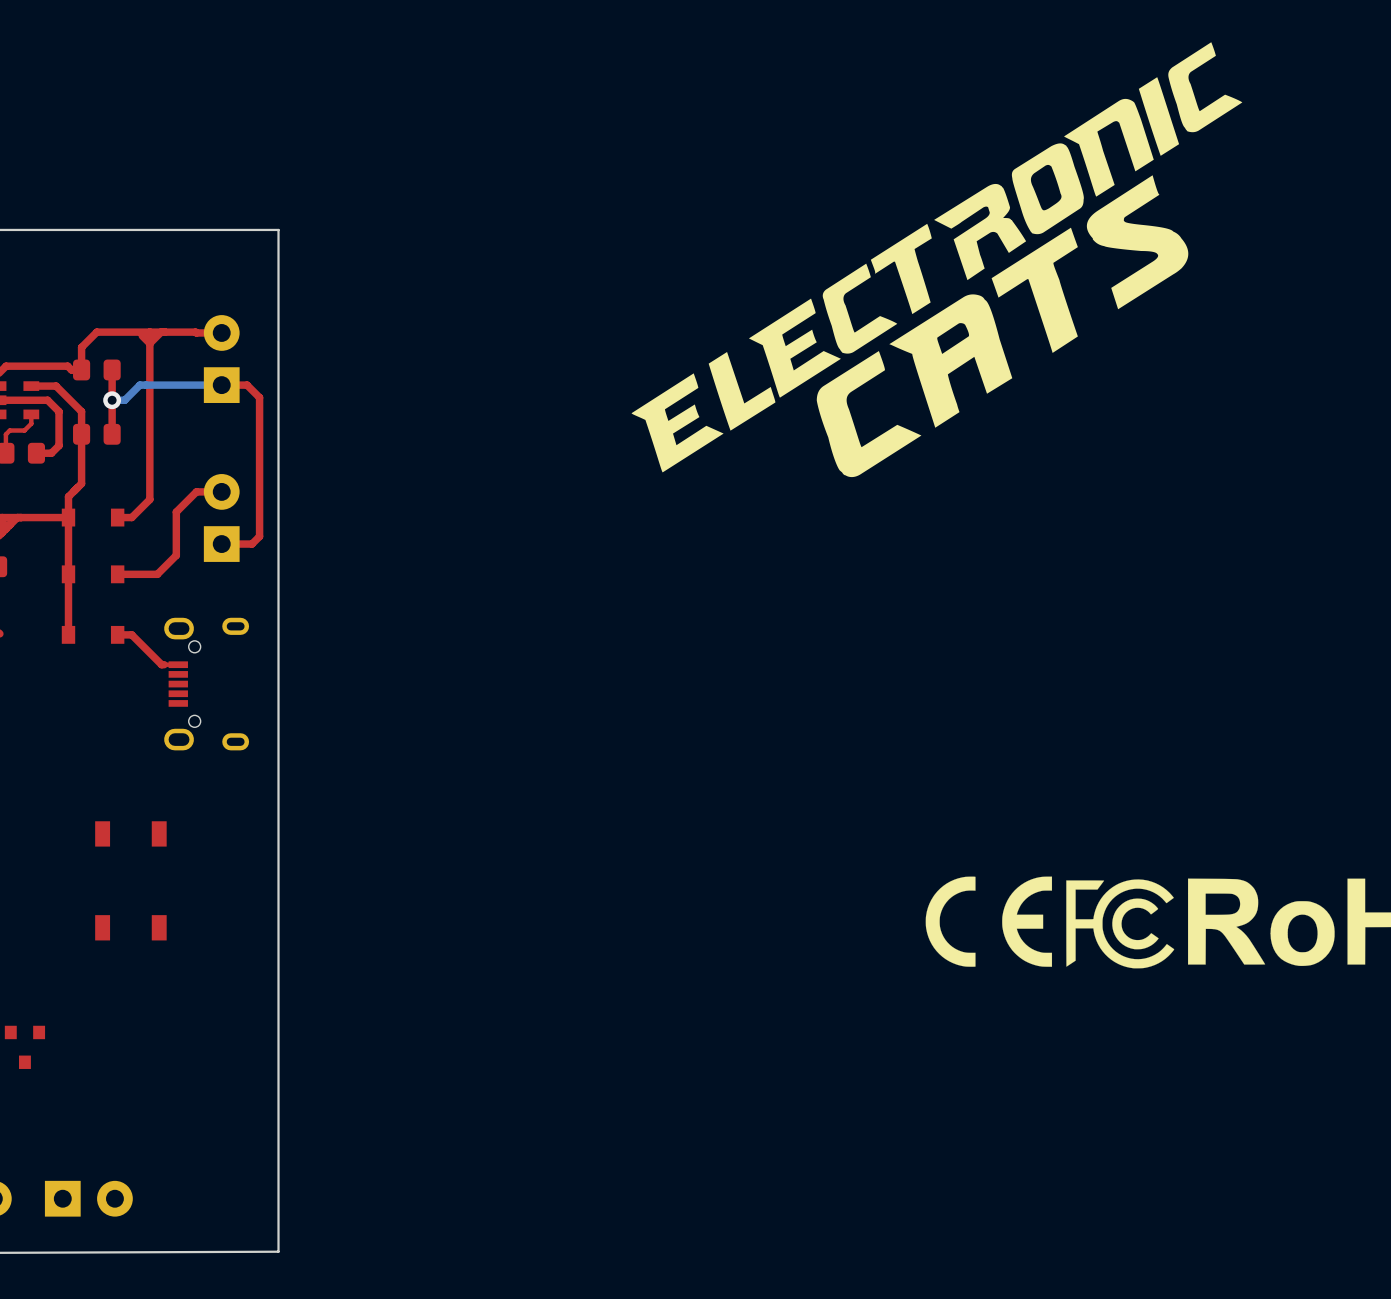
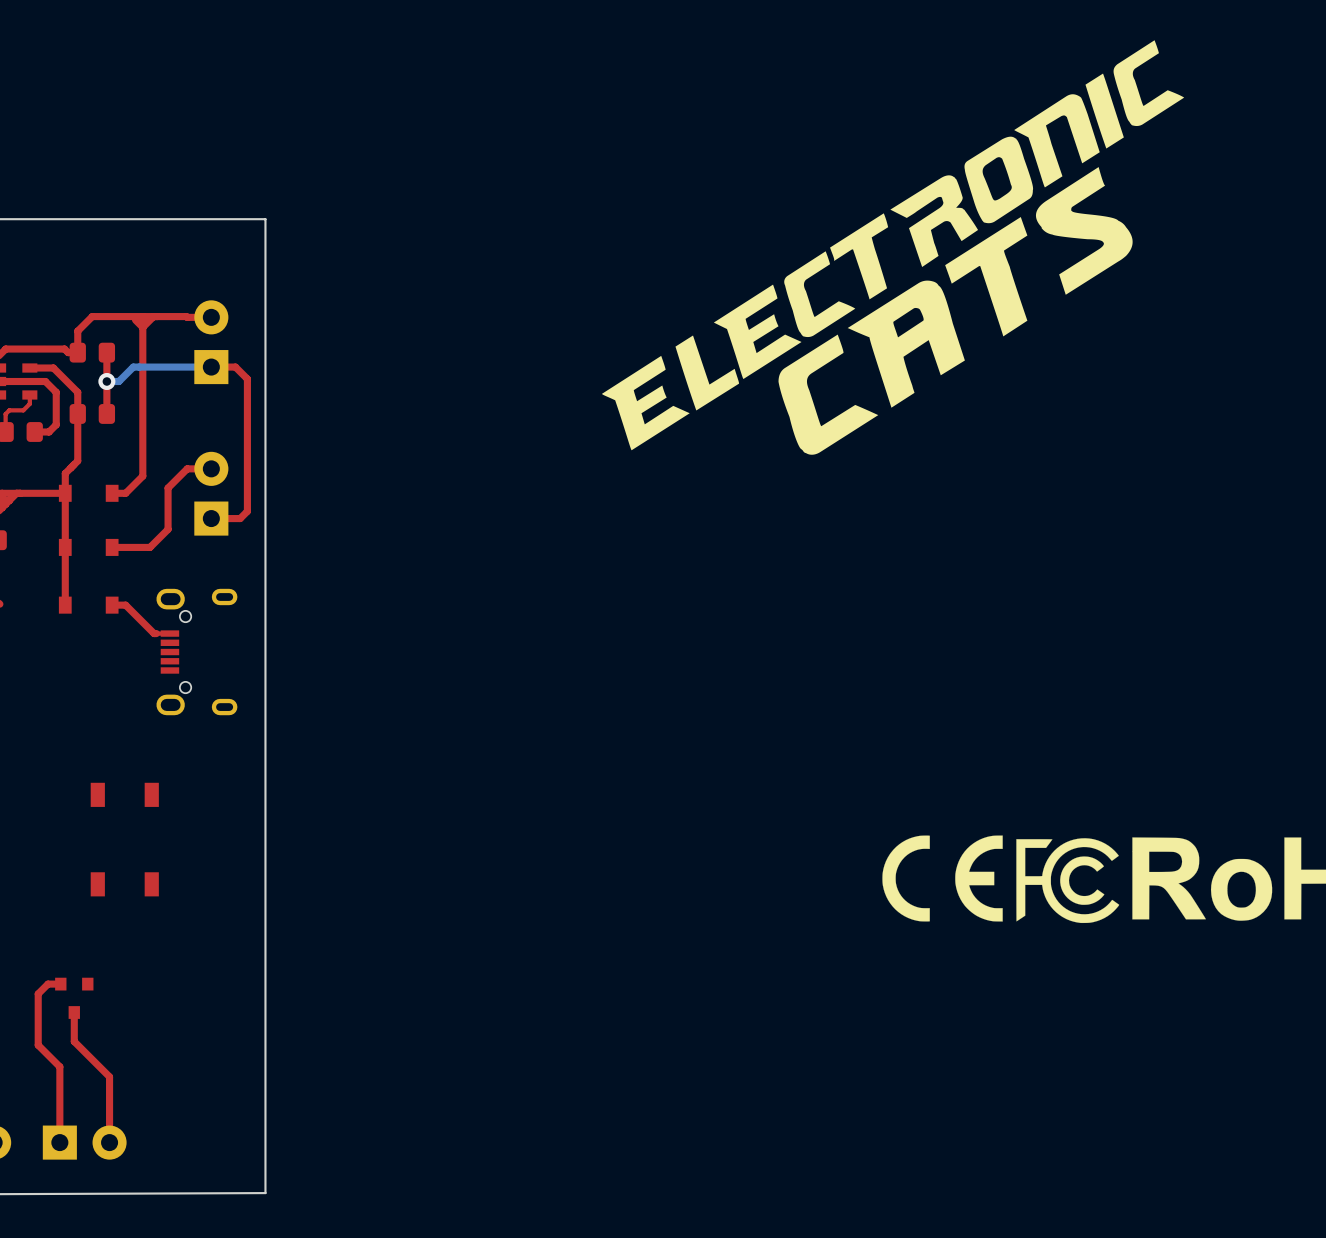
top track: none -> (60, 984) (48, 984) (38, 993) (38, 1045) (59, 1066) (59, 1142)
part position: (24, 1047) -> (74, 998)
top track: none -> (74, 1012) (74, 1041) (109, 1076) (109, 1142)

